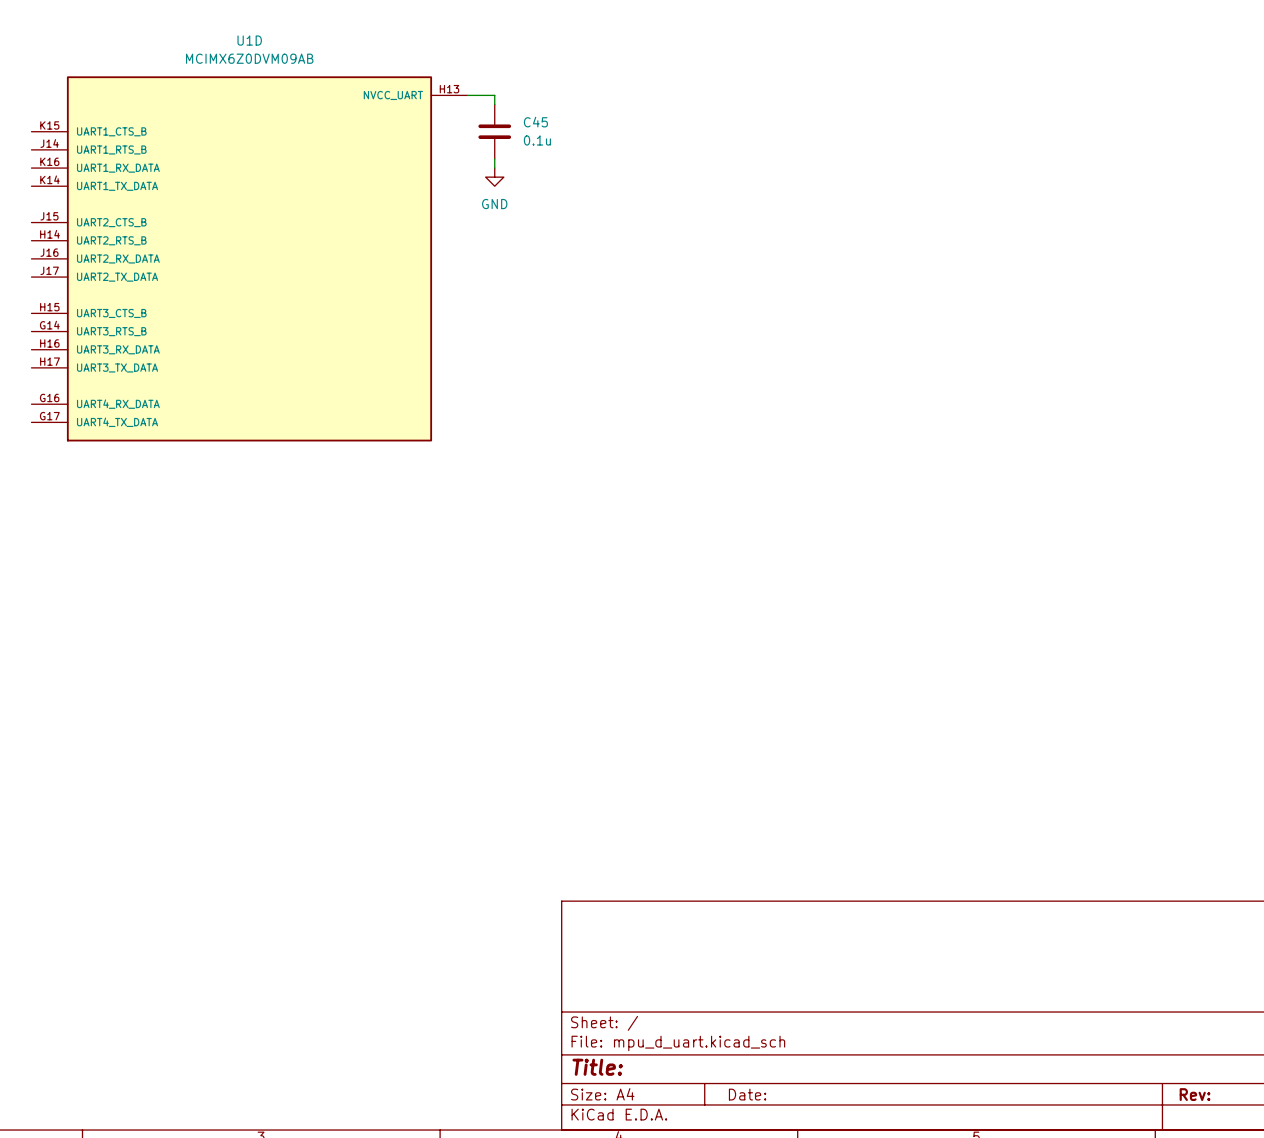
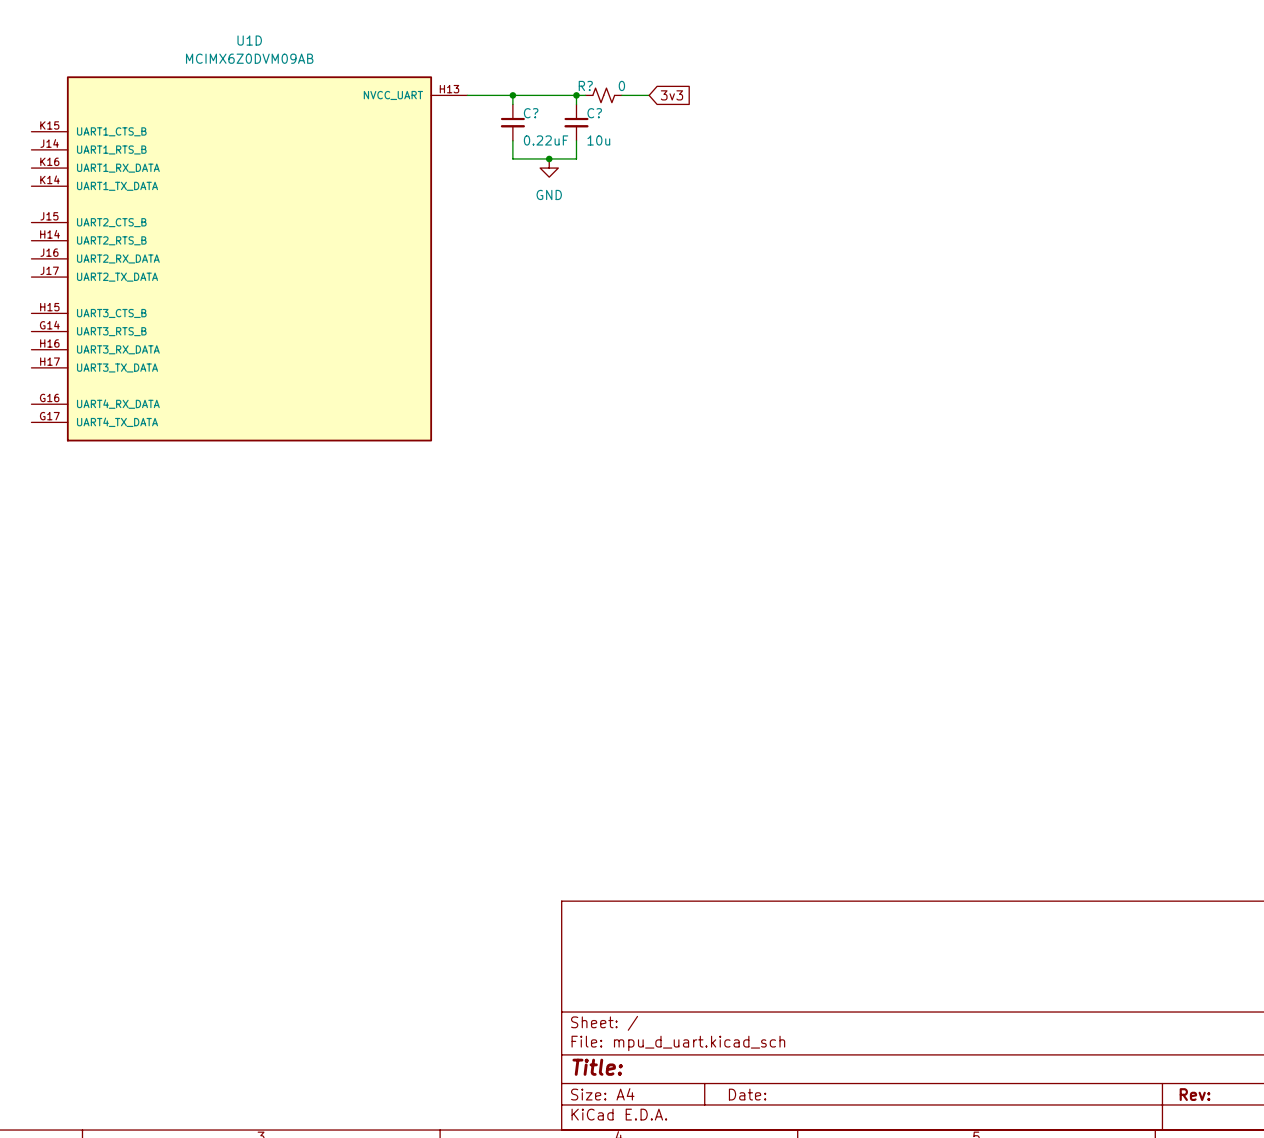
wire: (494, 95) (494, 104) -> (494, 95) (585, 95)
junction: none -> (512, 95)
wire: none -> (576, 95) (576, 104)
junction: none -> (576, 95)
R?: none -> 0 (603, 95)
wire: none -> (621, 95) (649, 95)
global label: none -> 3v3 (671, 95)
C?: none -> 0.22uF (512, 122)
C?: none -> 10u (576, 122)
C45: 0.1u (494, 131) -> none
wire: none -> (512, 140) (512, 158) (576, 158) (576, 140)
wire: (494, 158) (494, 168) -> (512, 95) (512, 104)
junction: none -> (549, 158)
power symbol position: GND (494, 177) -> GND (549, 168)

